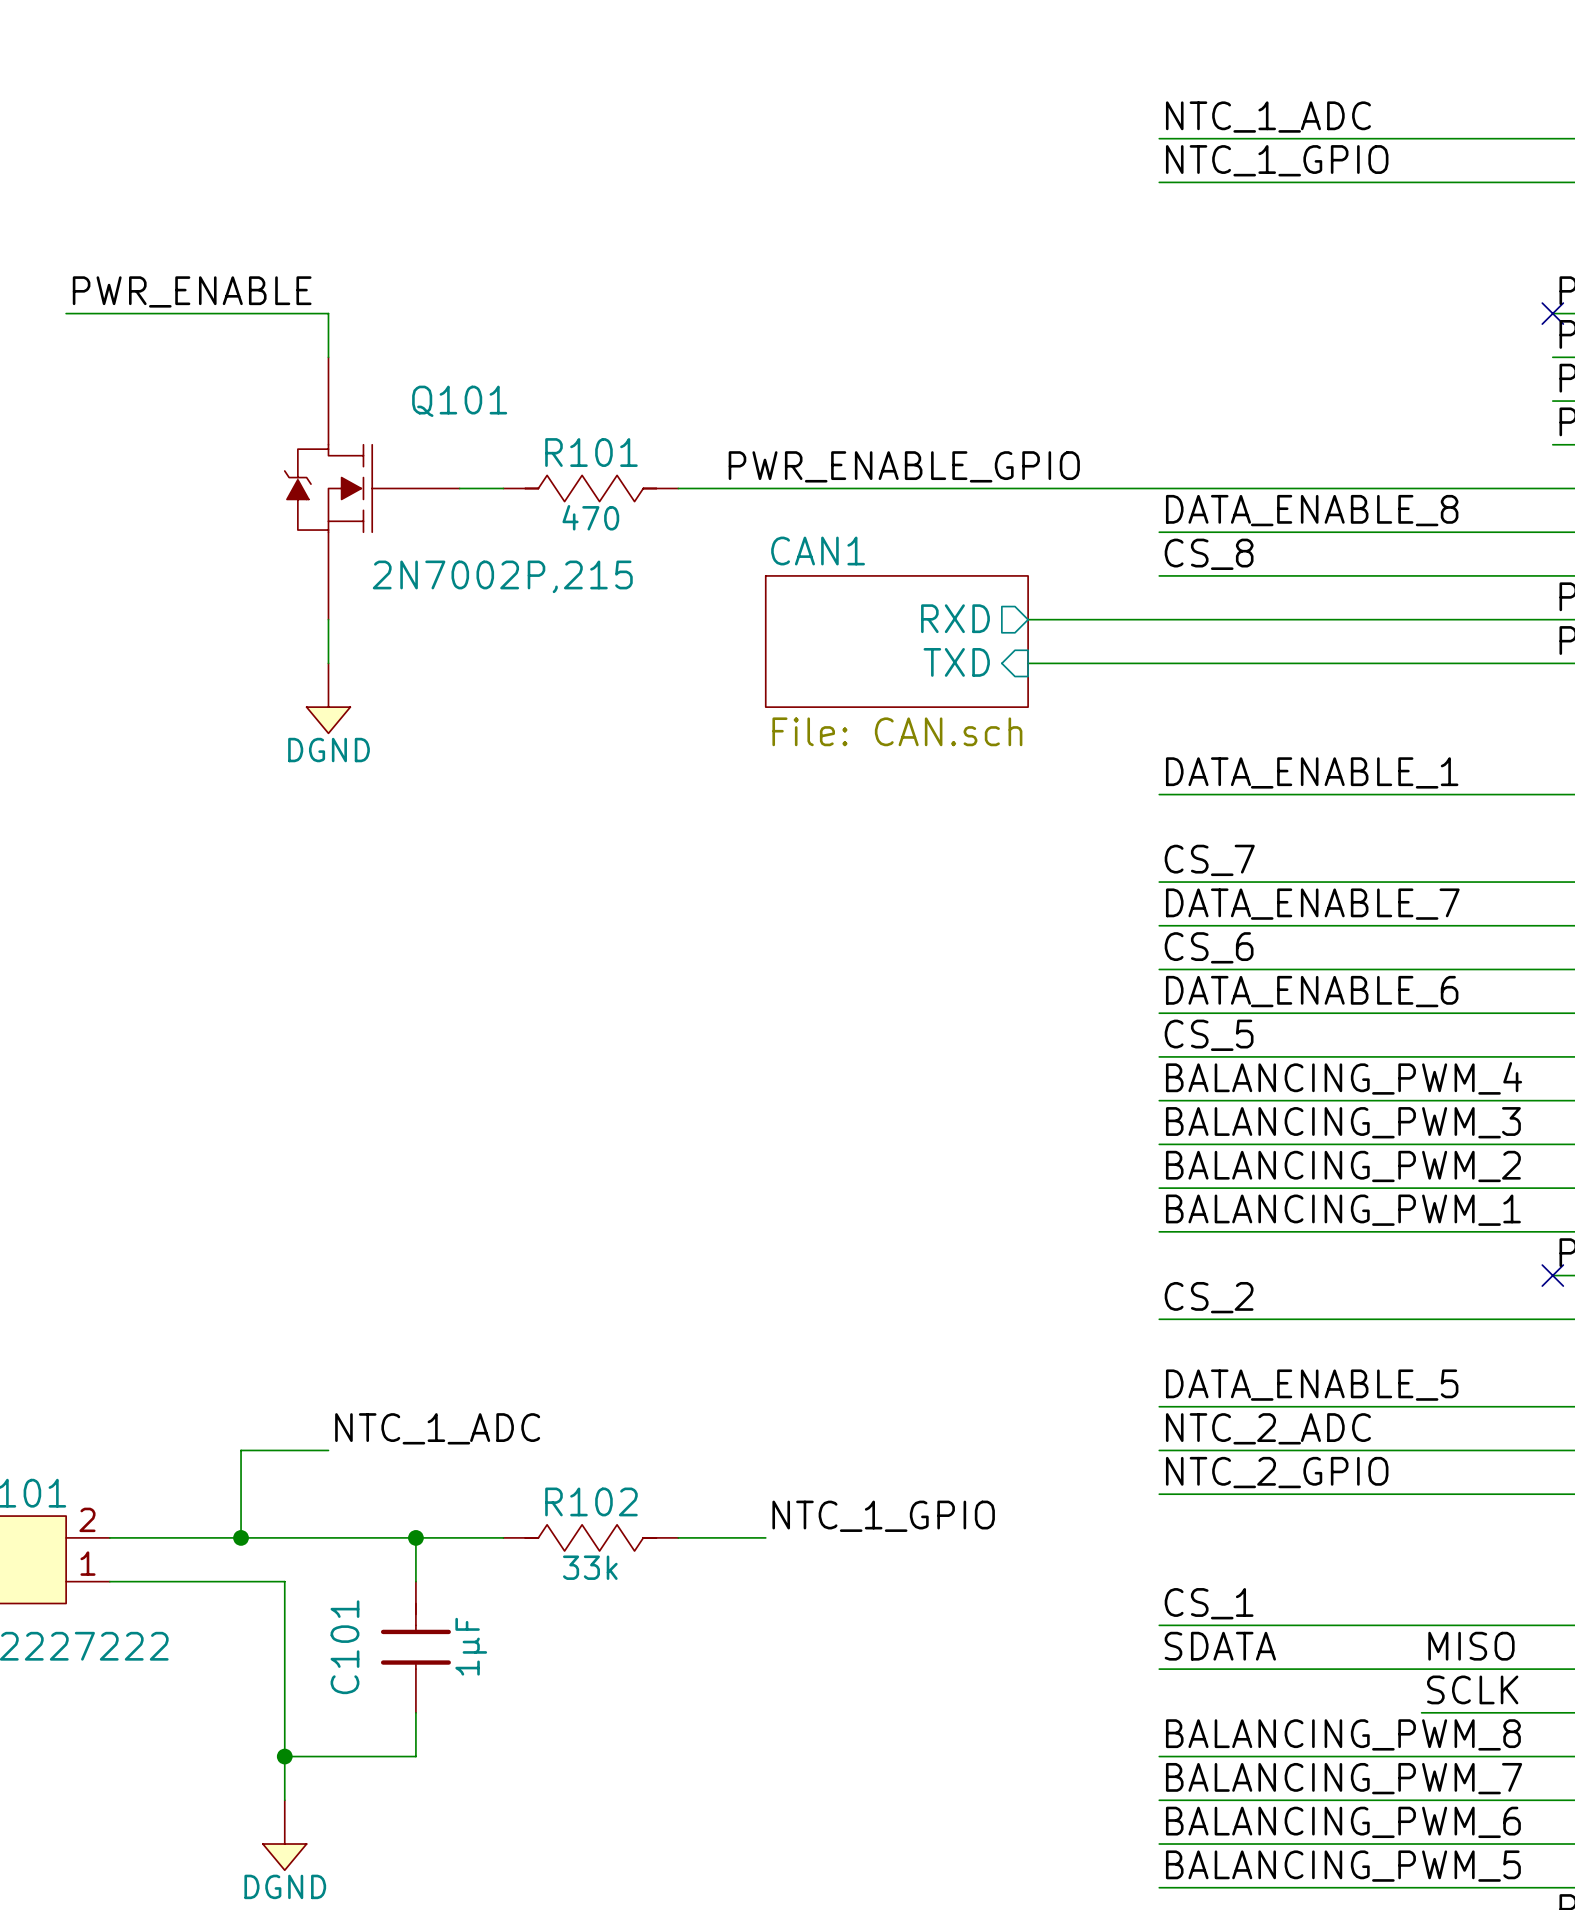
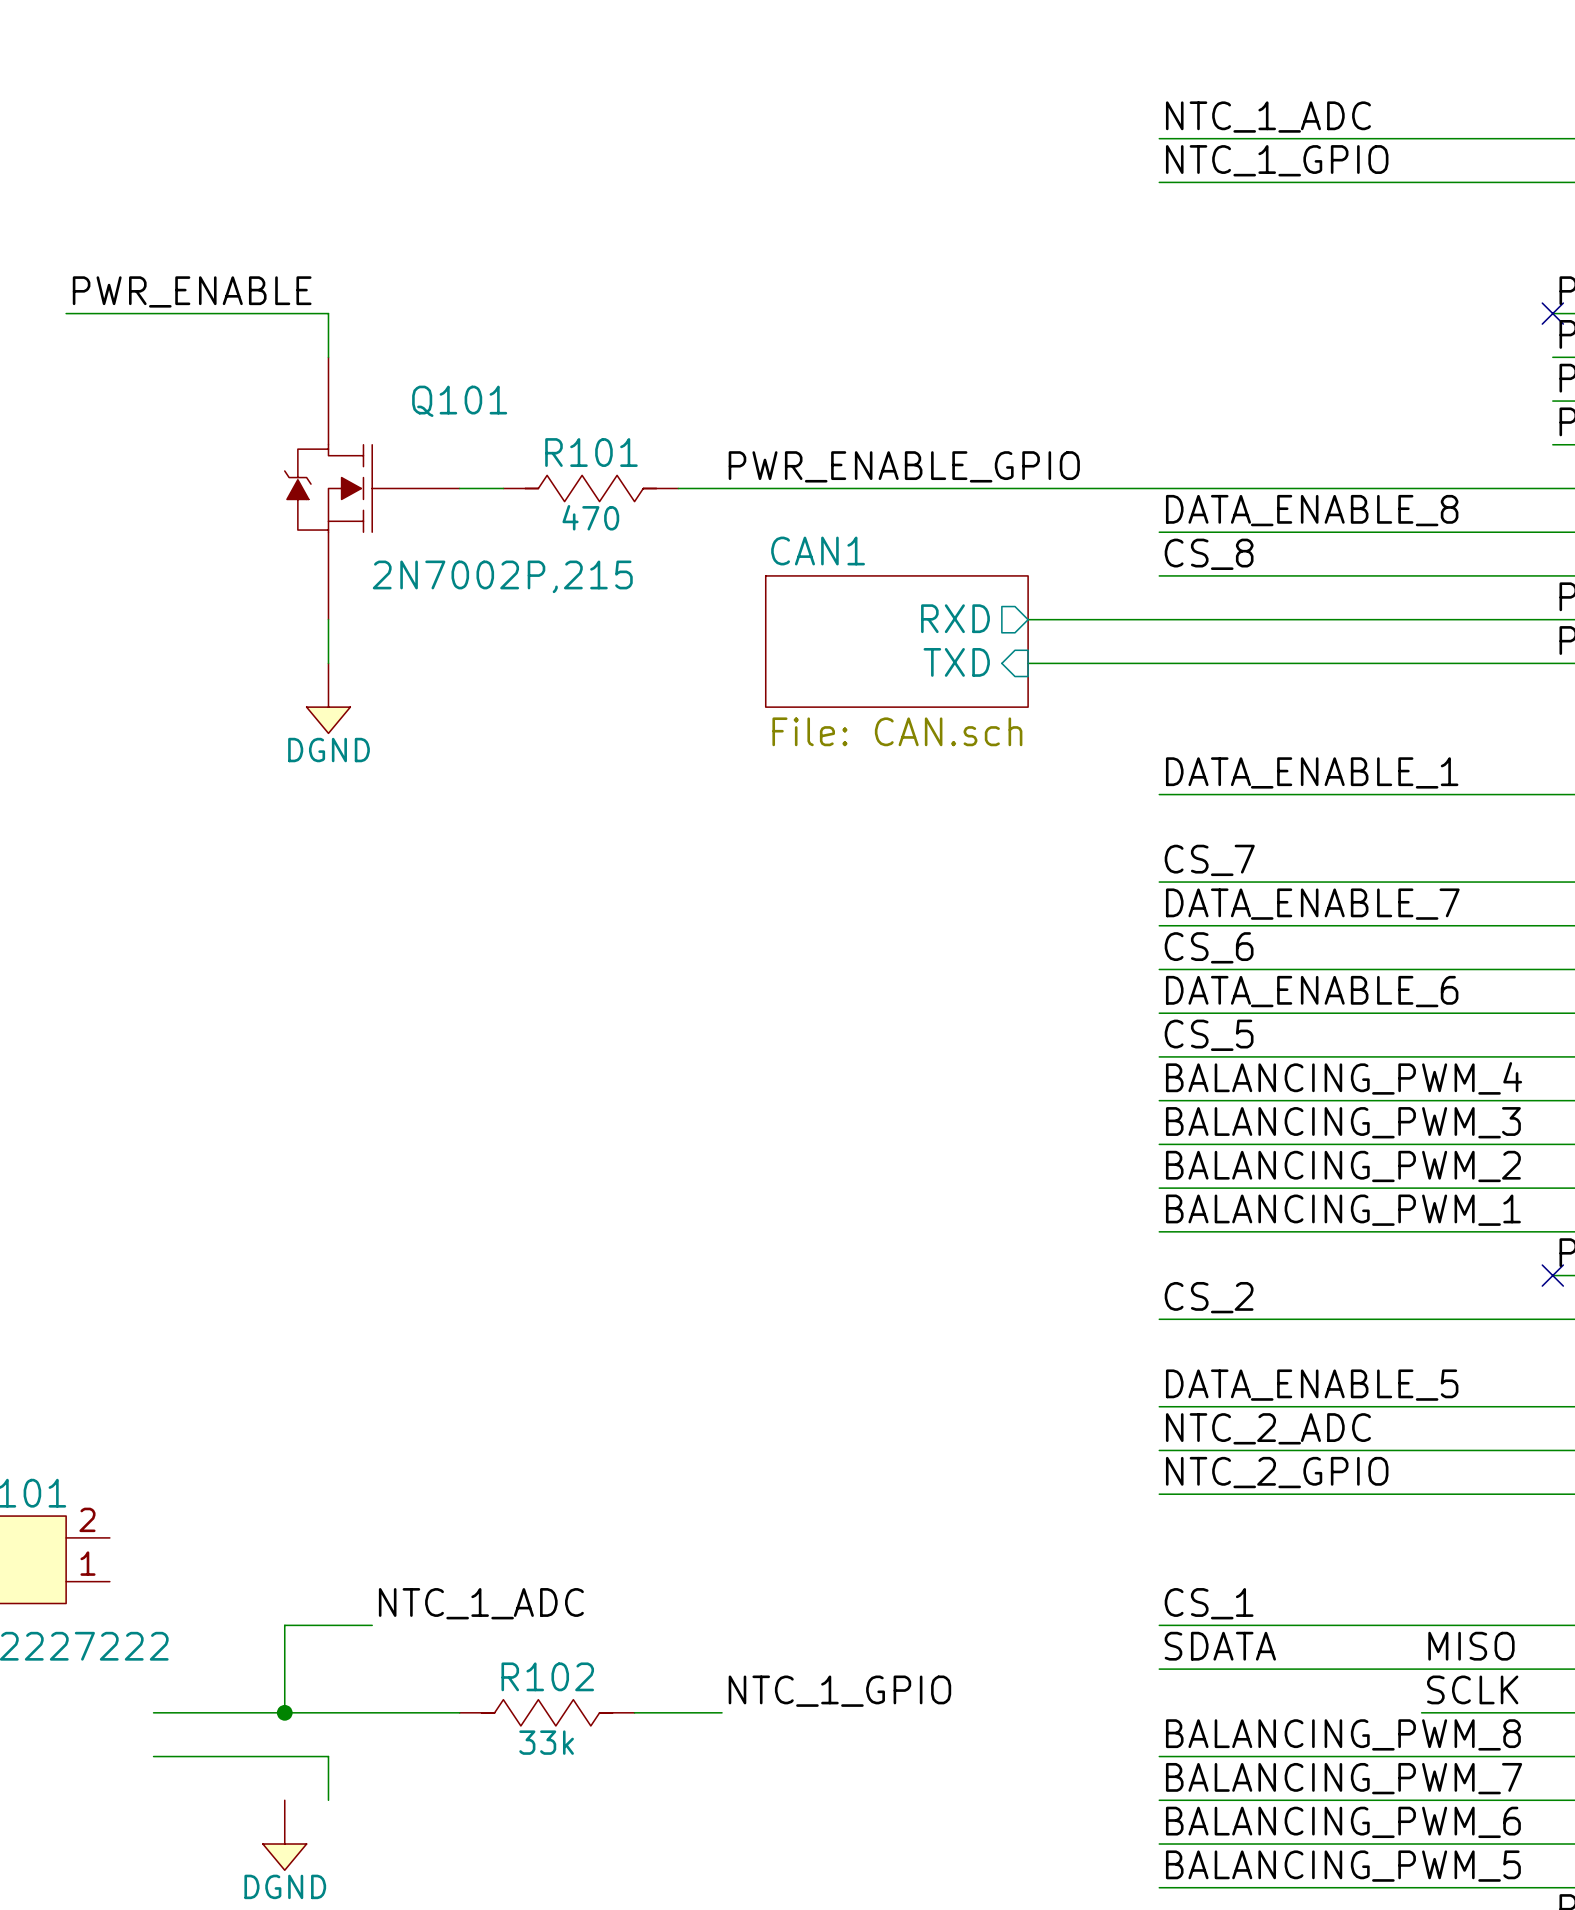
label position: NTC_1_ADC (437, 1428) -> NTC_1_ADC (481, 1603)
wire: (328, 1450) (241, 1450) (241, 1537) -> none
label position: NTC_1_GPIO (883, 1516) -> NTC_1_GPIO (839, 1691)
wire: (109, 1537) (503, 1537) -> none
junction: (241, 1537) -> none
wire: (415, 1537) (415, 1581) -> none
junction: (415, 1537) -> none
R102 position: (590, 1537) -> (547, 1712)
wire: (678, 1537) (765, 1537) -> (634, 1712) (722, 1712)
wire: (109, 1581) (284, 1581) (284, 1625) -> (372, 1625) (284, 1625)
C101: (415, 1647) -> none
wire: none -> (153, 1712) (459, 1712)
wire: (284, 1712) (284, 1800) -> none
wire: (415, 1712) (415, 1756) (328, 1756) -> (328, 1800) (328, 1756)
wire: none -> (153, 1756) (284, 1756)
junction position: (284, 1756) -> (284, 1712)

